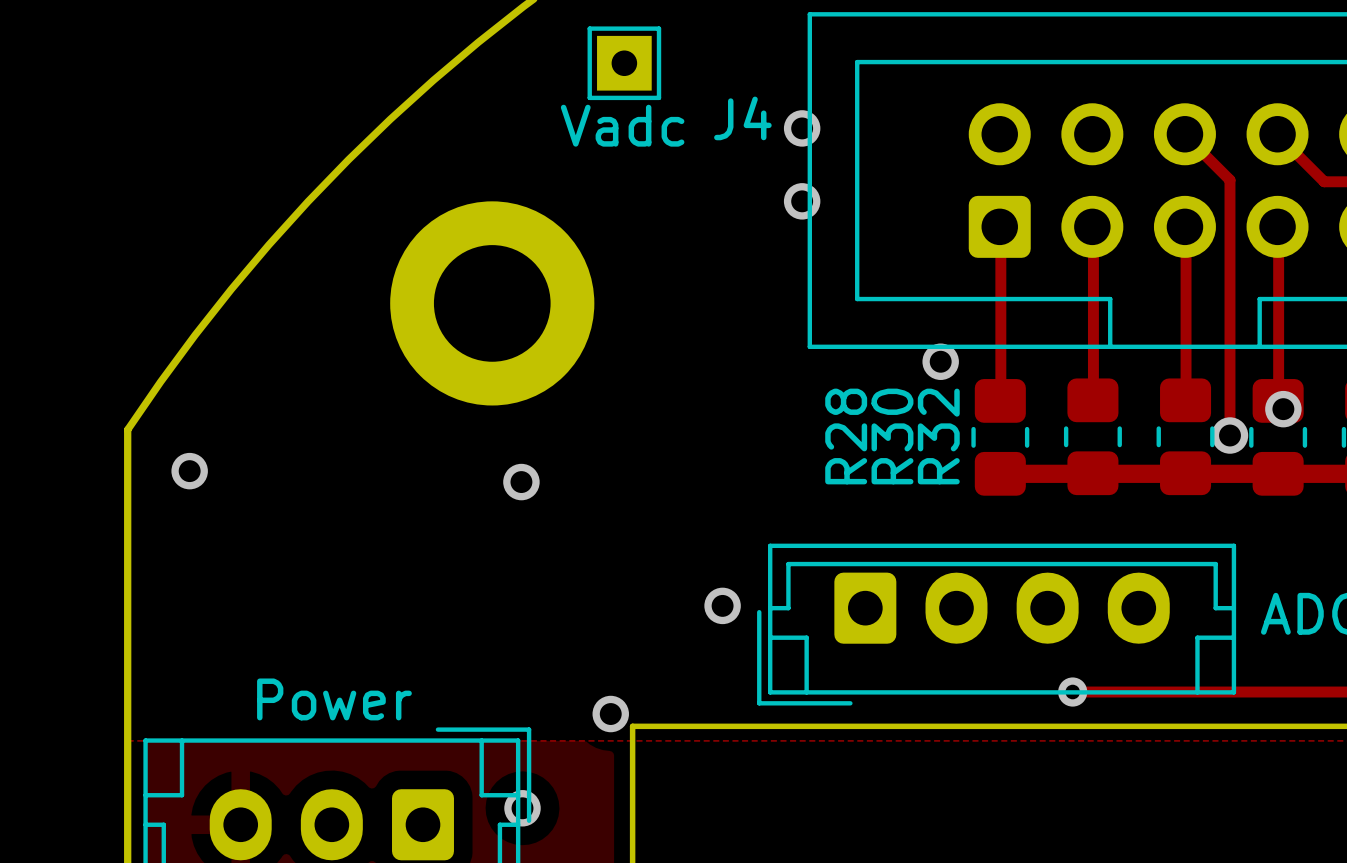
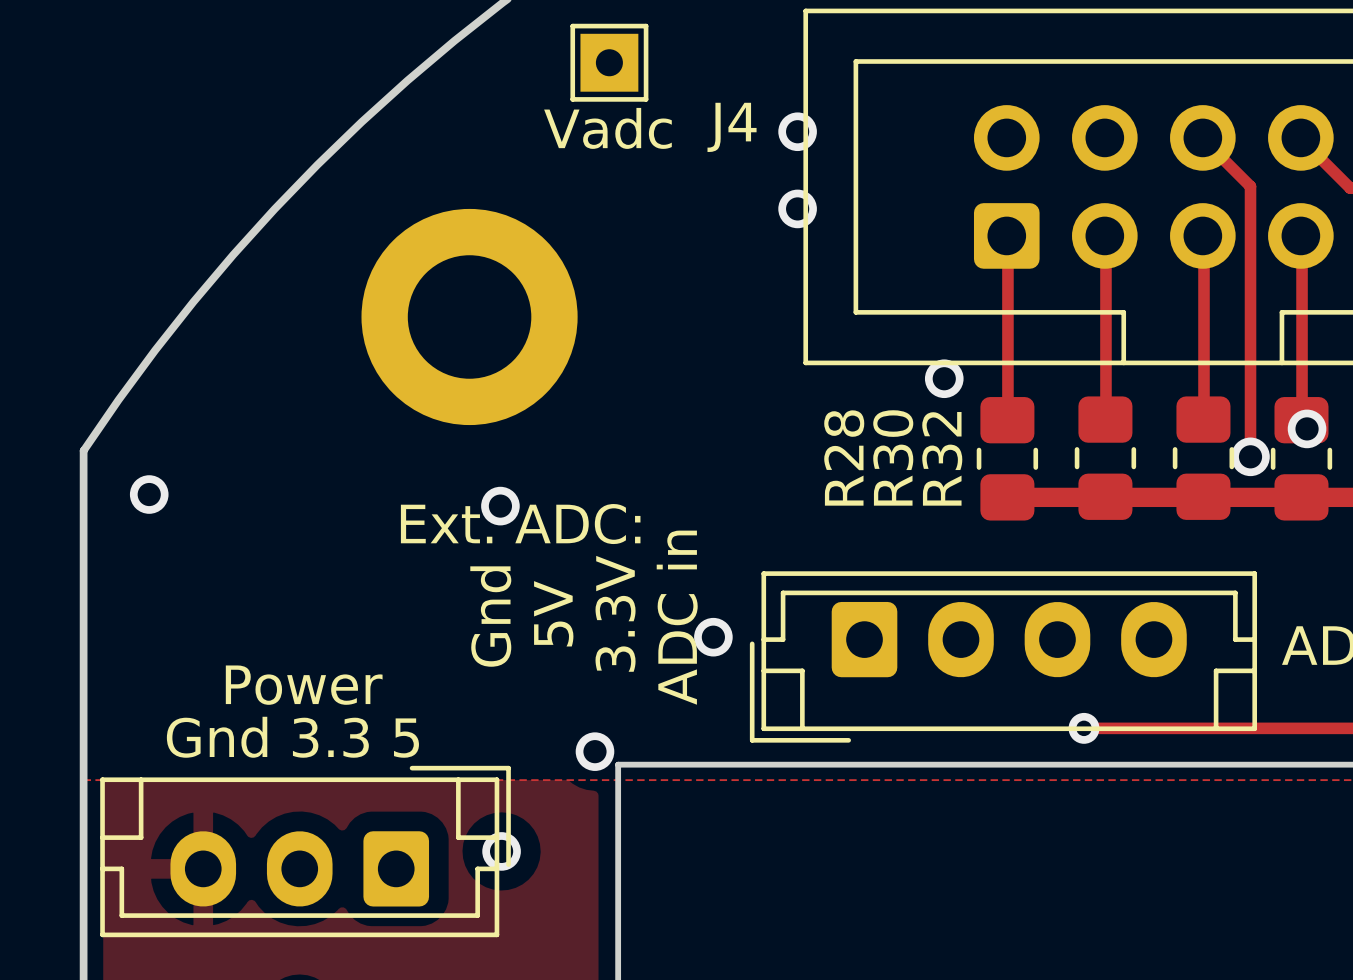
text: none -> Ext. ADC: (520, 524)
text: none -> 5V (553, 613)
text: none -> 3.3V (615, 613)
text: none -> Gnd (490, 616)
text: none -> ADC in (677, 617)
part value position: Power (334, 699) -> Power (304, 685)
text: none -> Gnd 3.3 5 (292, 737)

